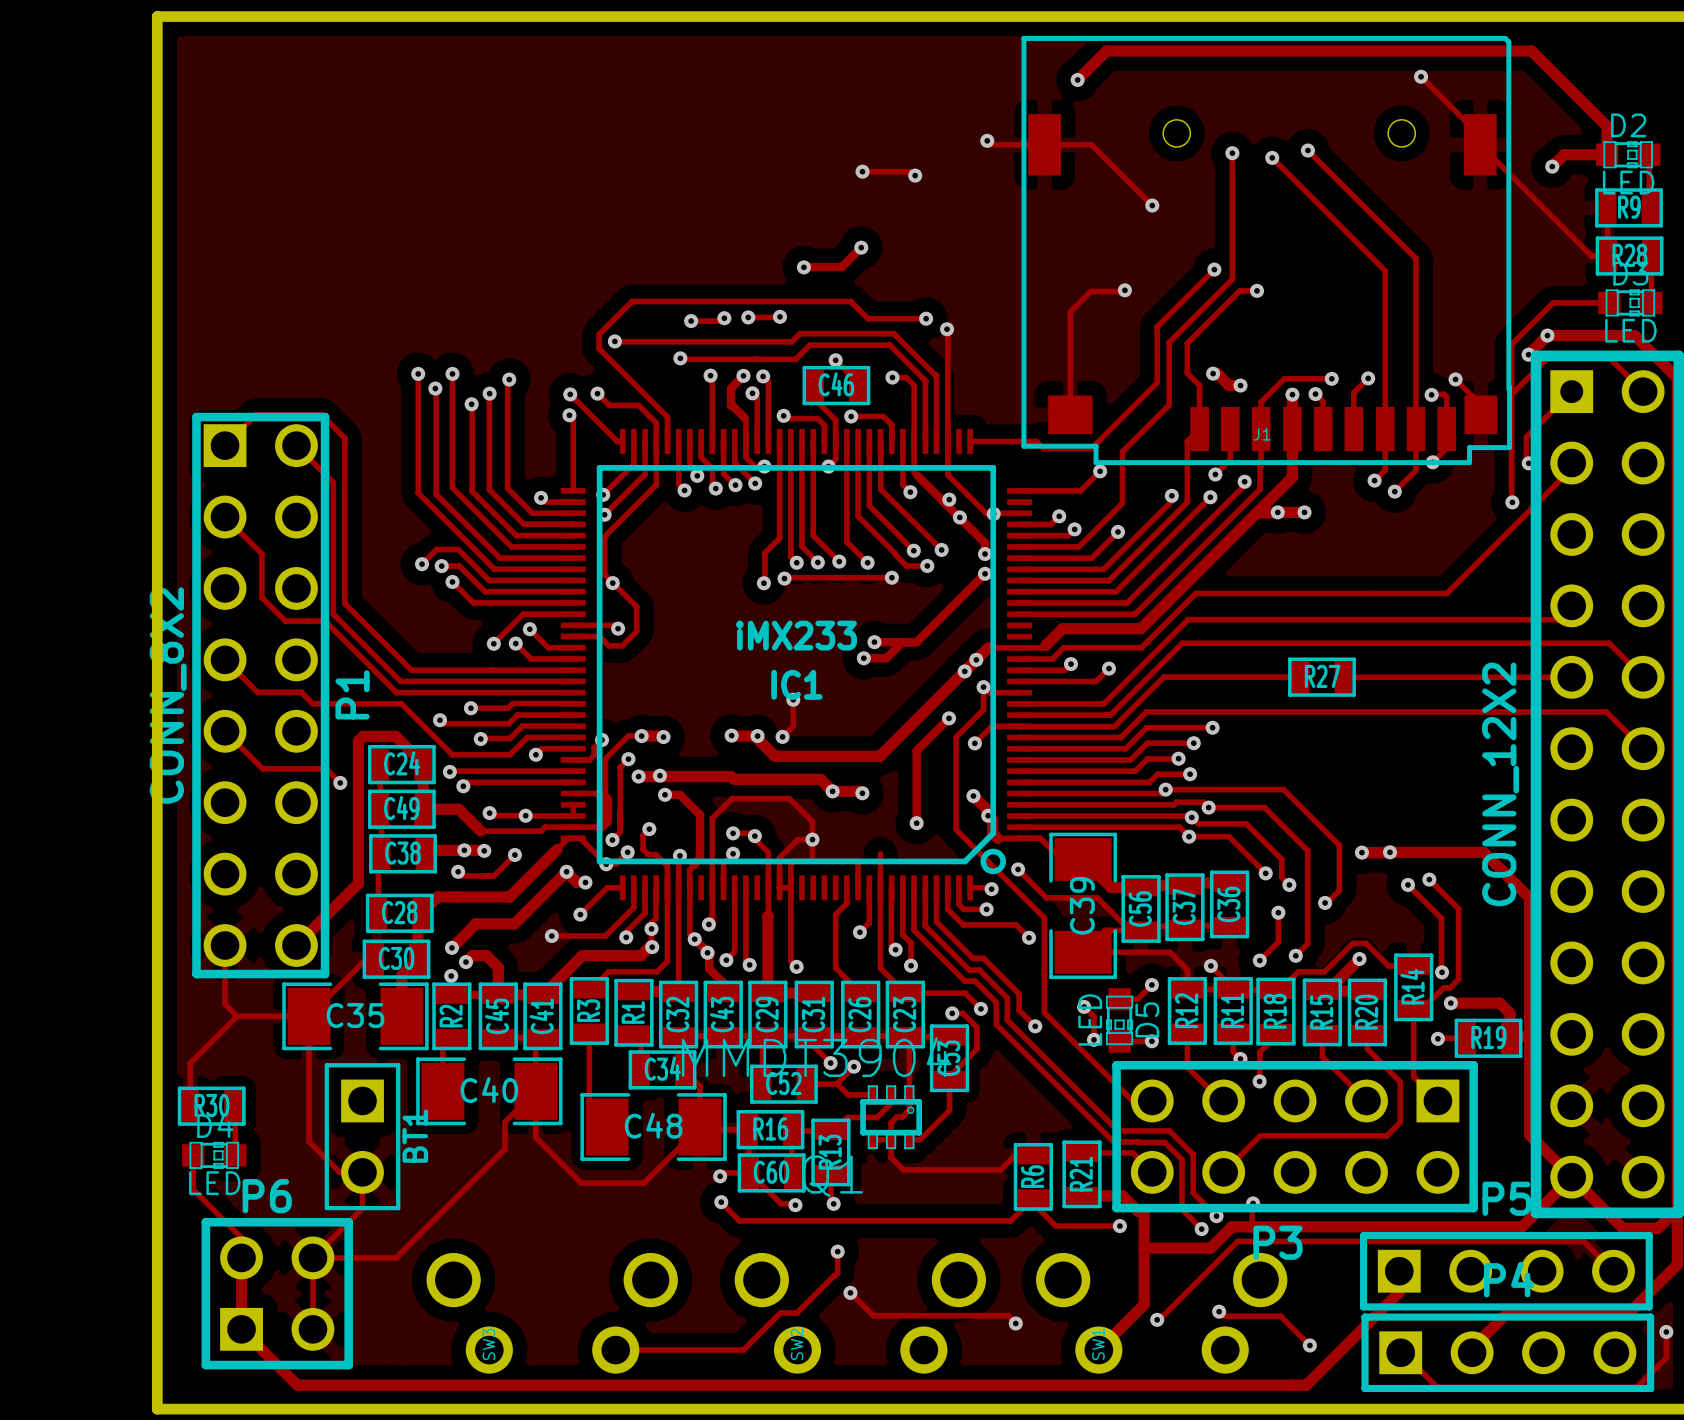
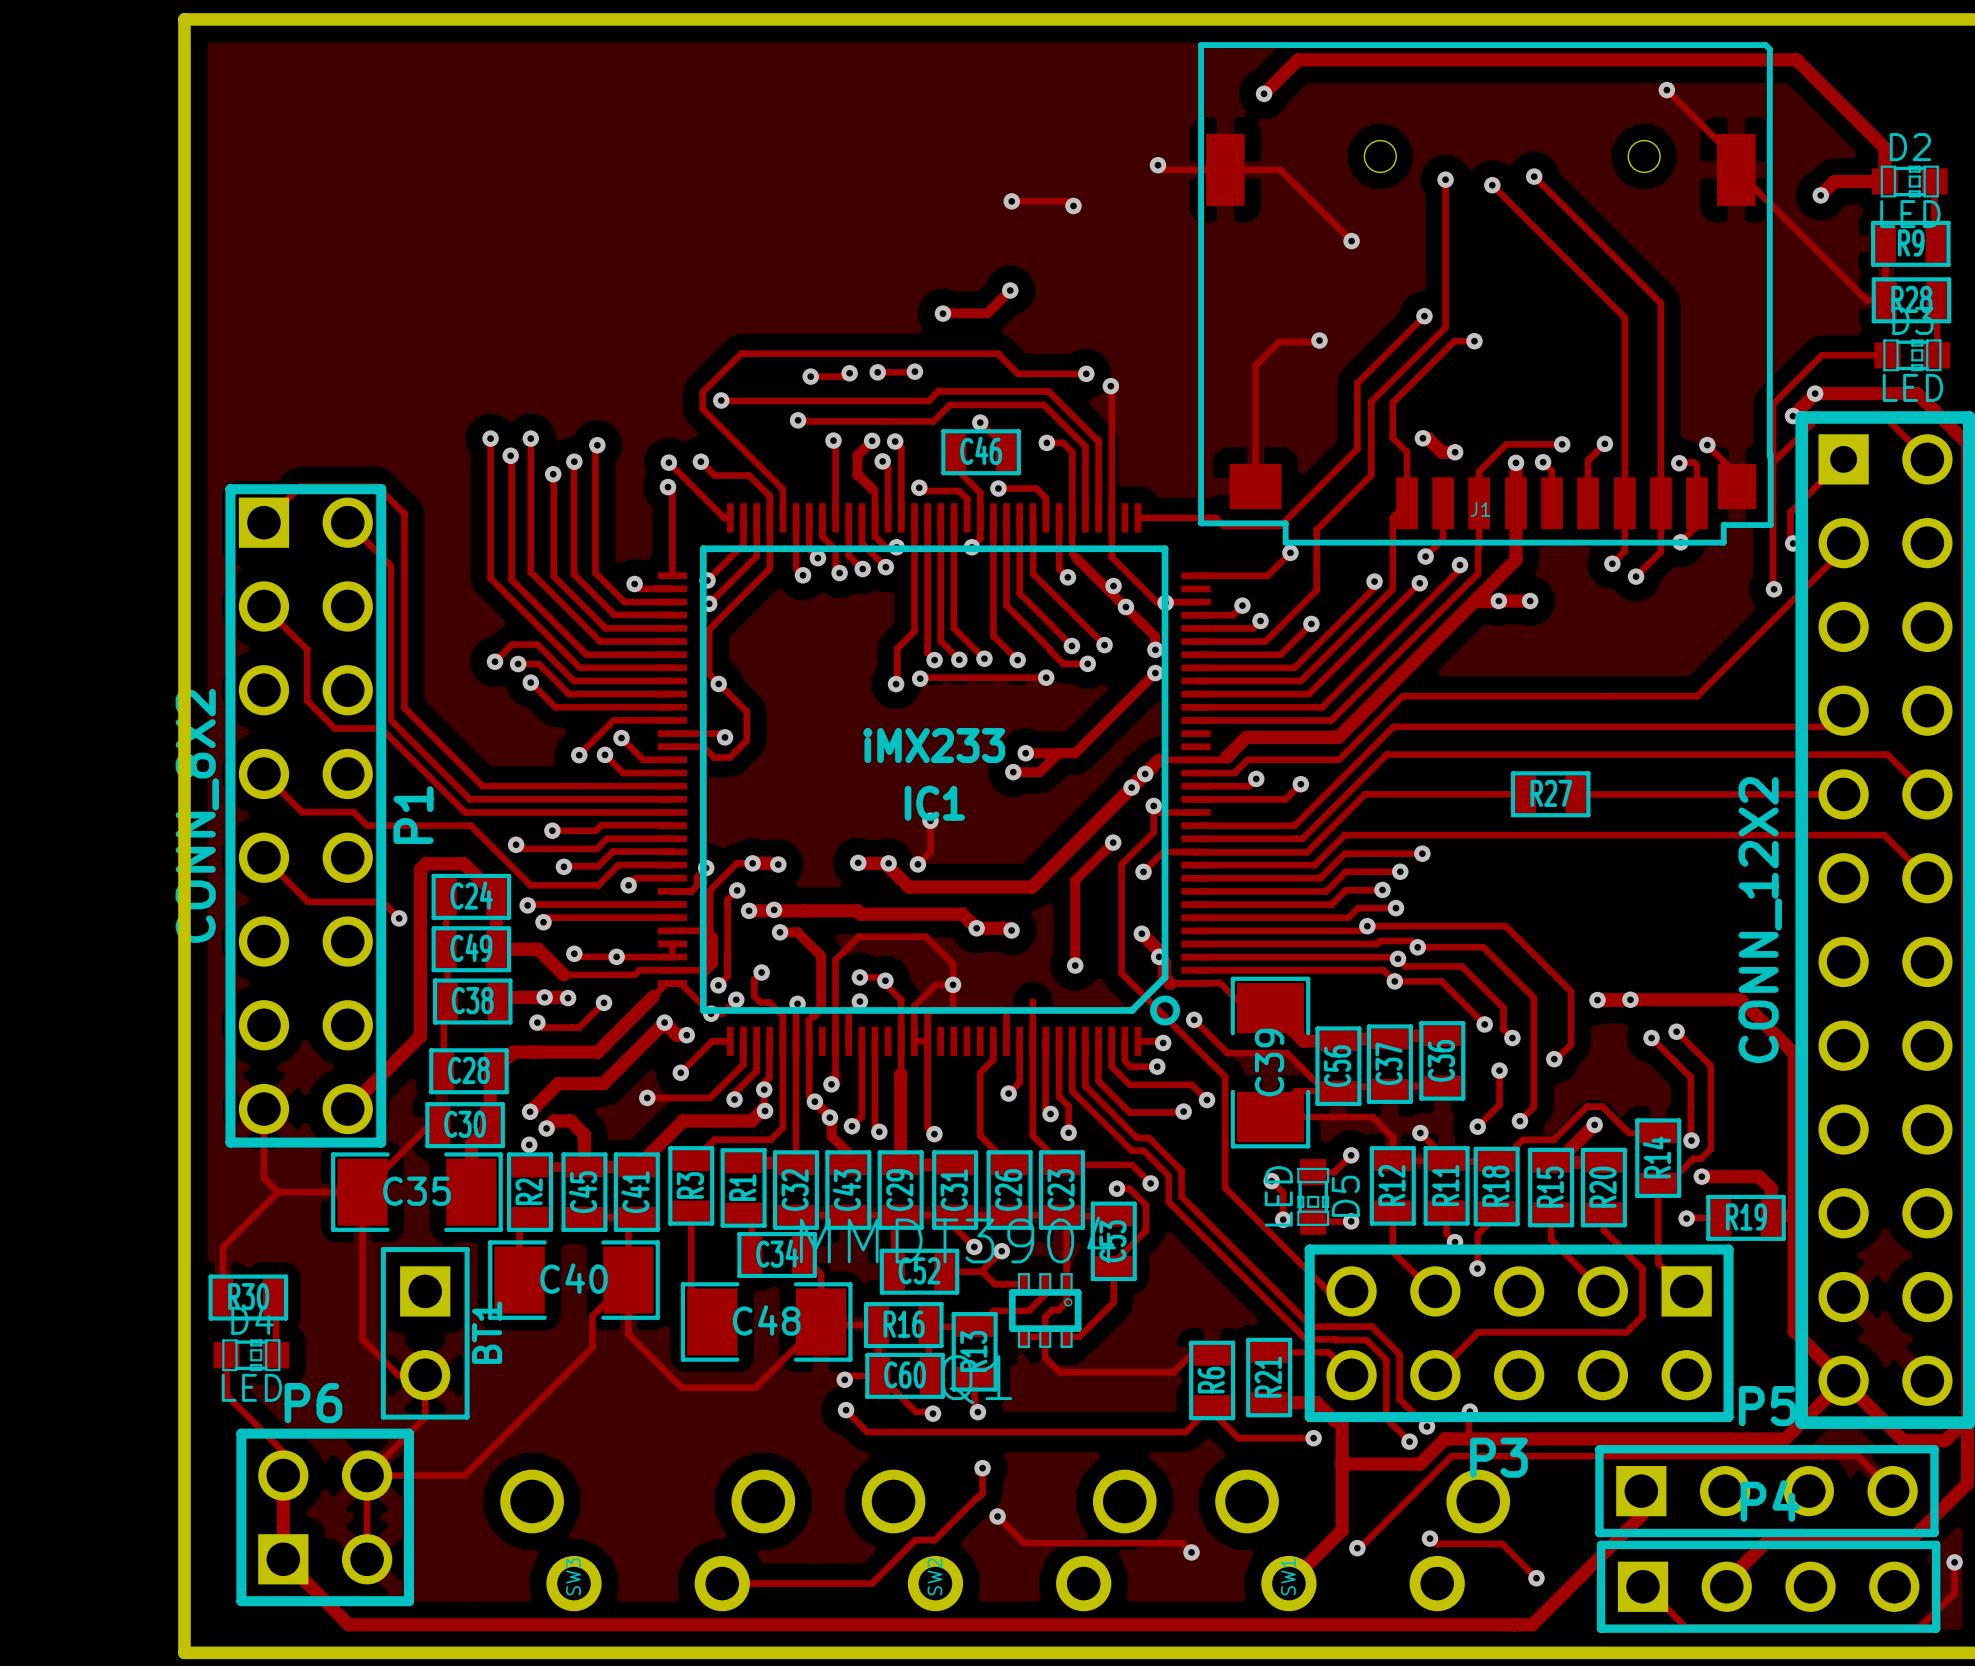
track: (963, 948) (972, 958) (983, 958) (1019, 993) (1019, 1010) (1035, 1026) -> (1129, 1112) (1183, 1111)
via position: (1035, 1026) -> (1183, 1111)

